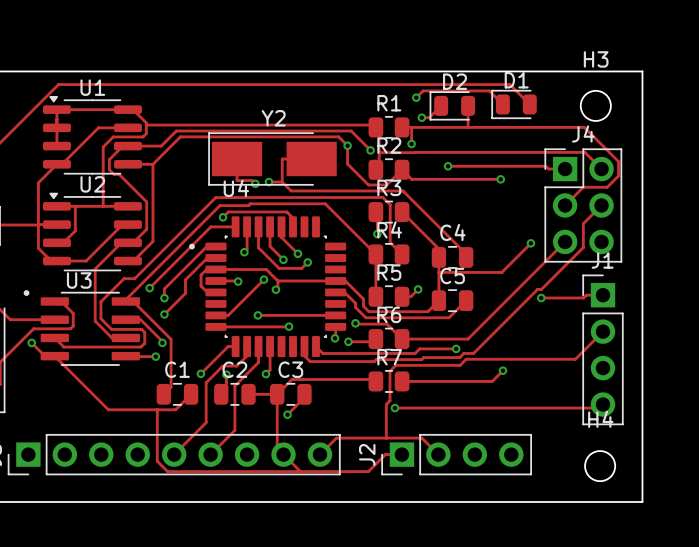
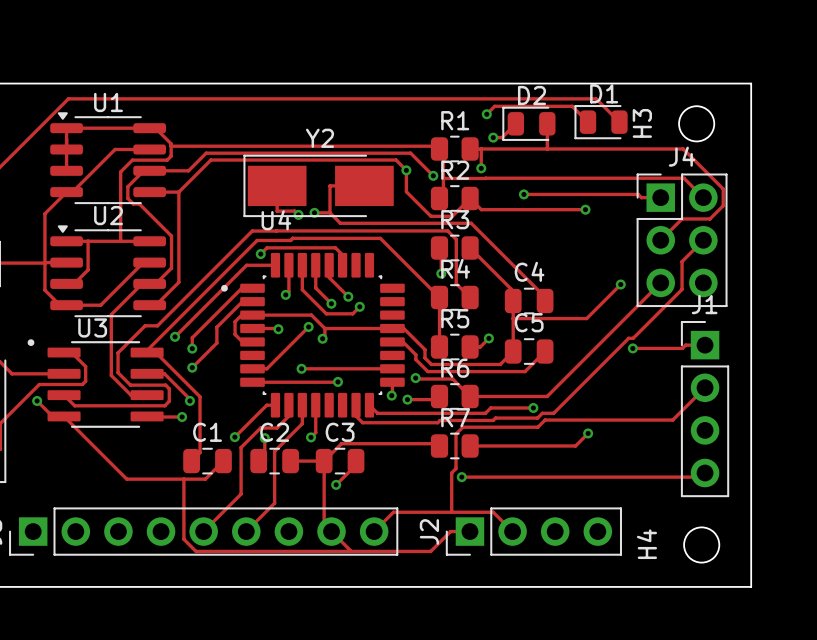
H3 name rotation: 0° (596, 59) -> 90° counterclockwise (642, 123)
H3 name position: H3 (596, 59) -> H3 (642, 123)
H4 name rotation: 0° (600, 419) -> 90° counterclockwise (646, 544)
H4 name position: H4 (600, 419) -> H4 (646, 544)

